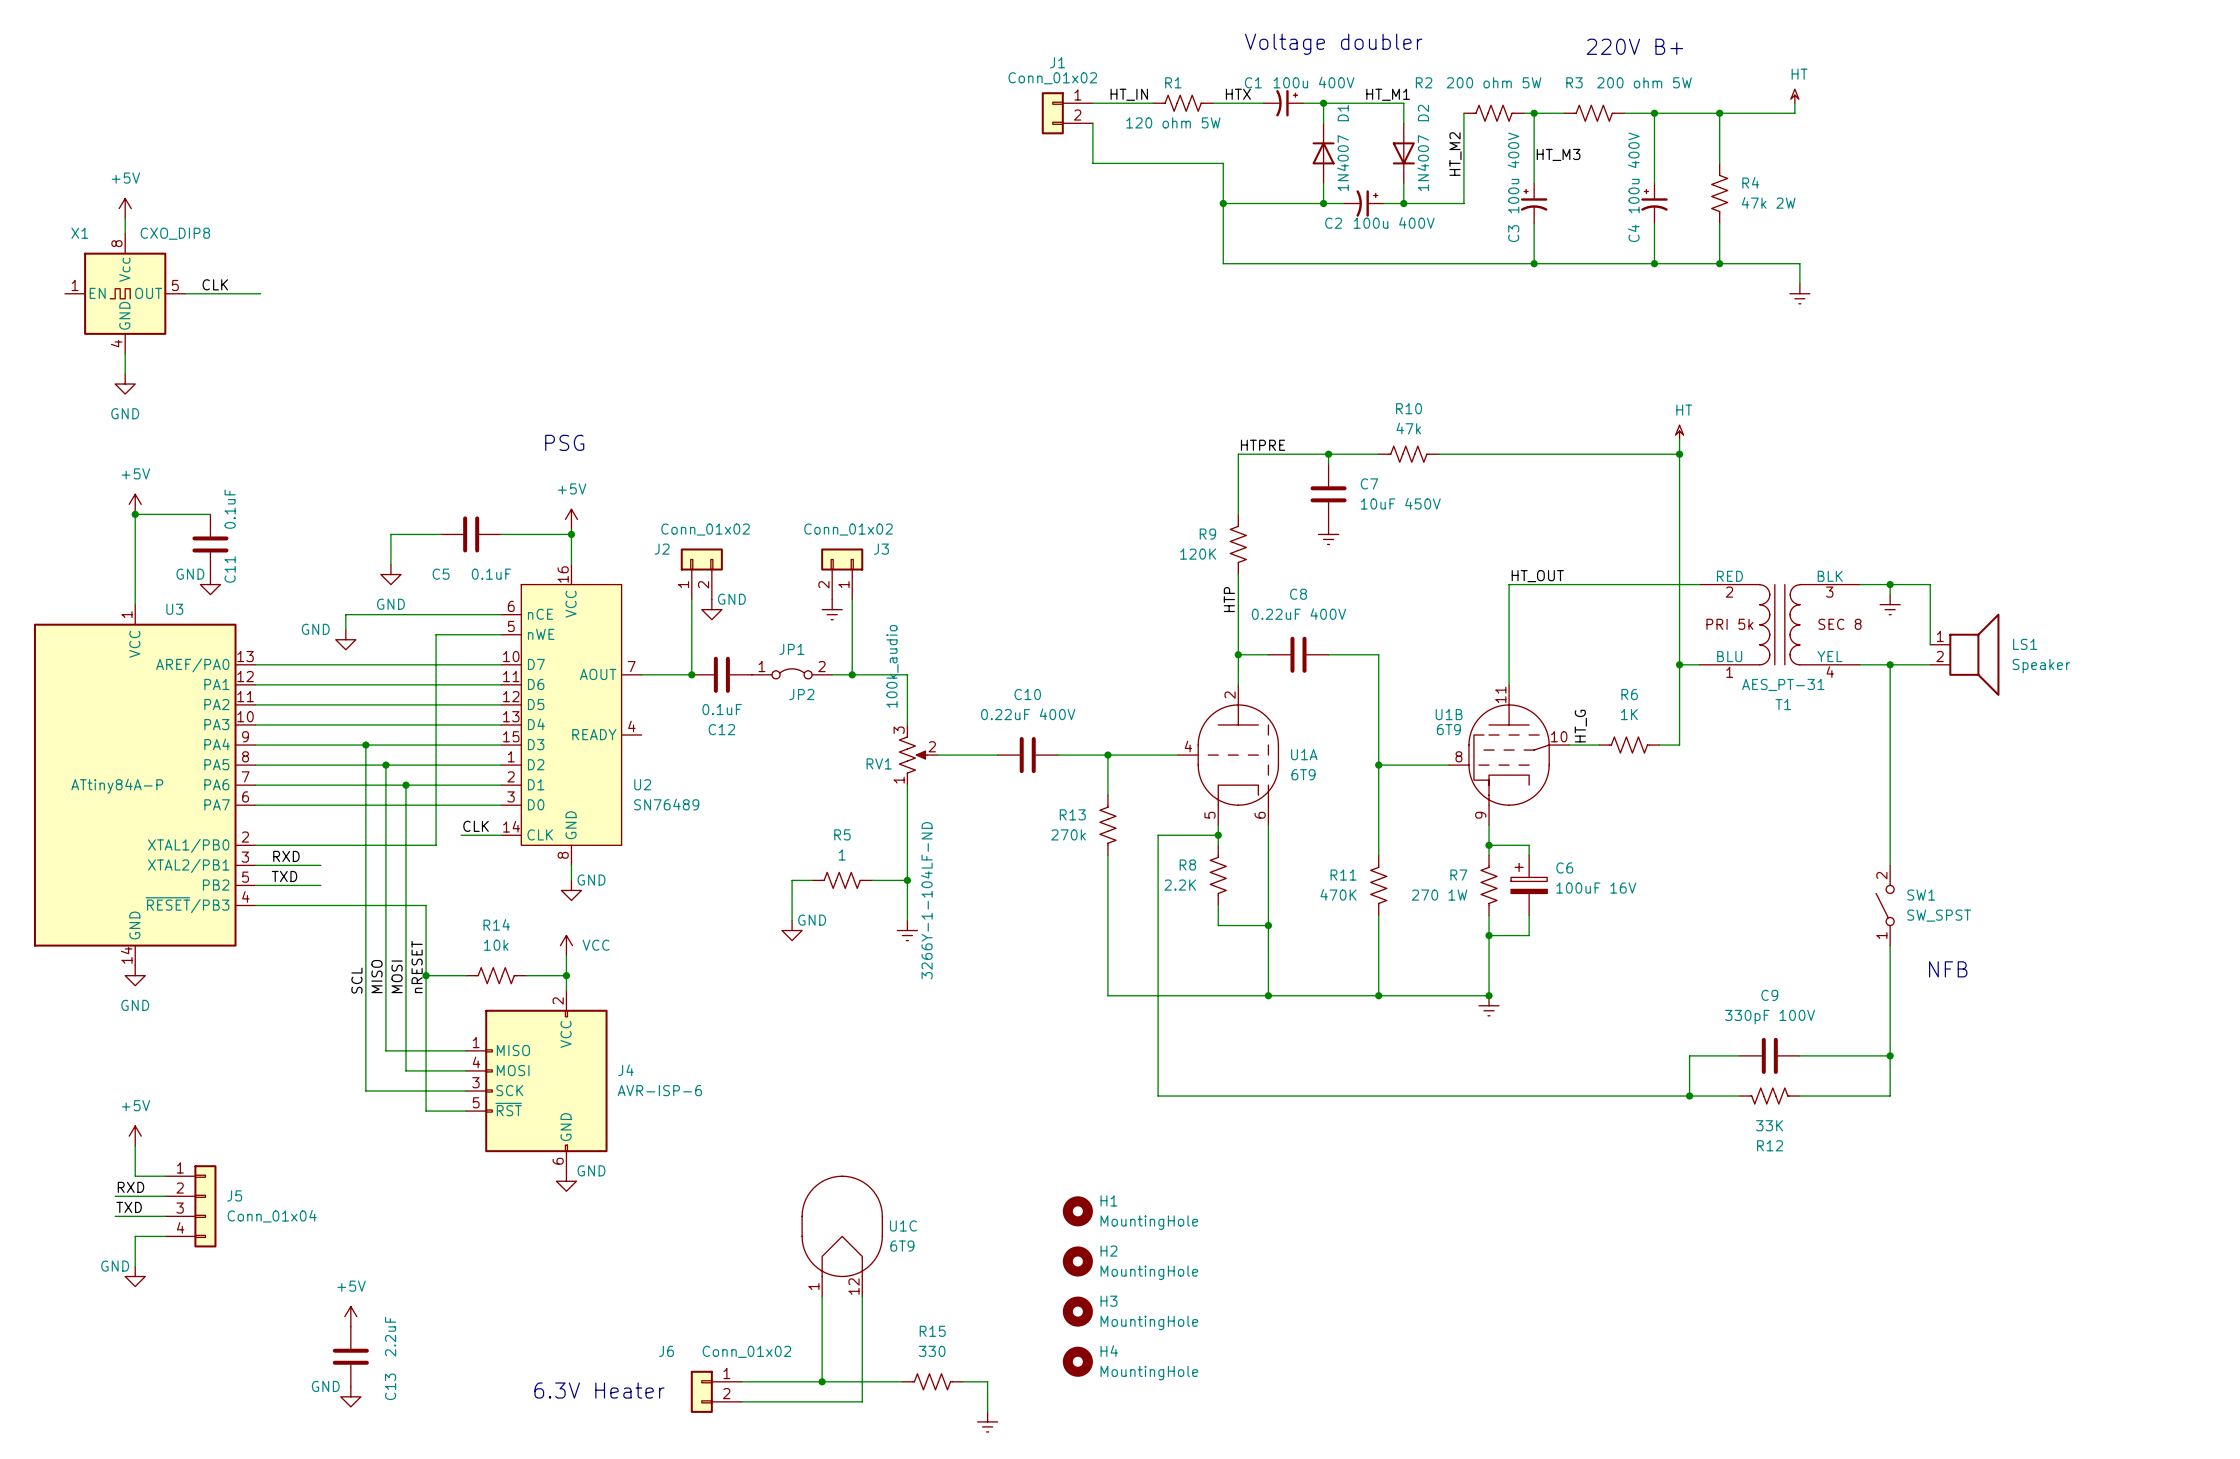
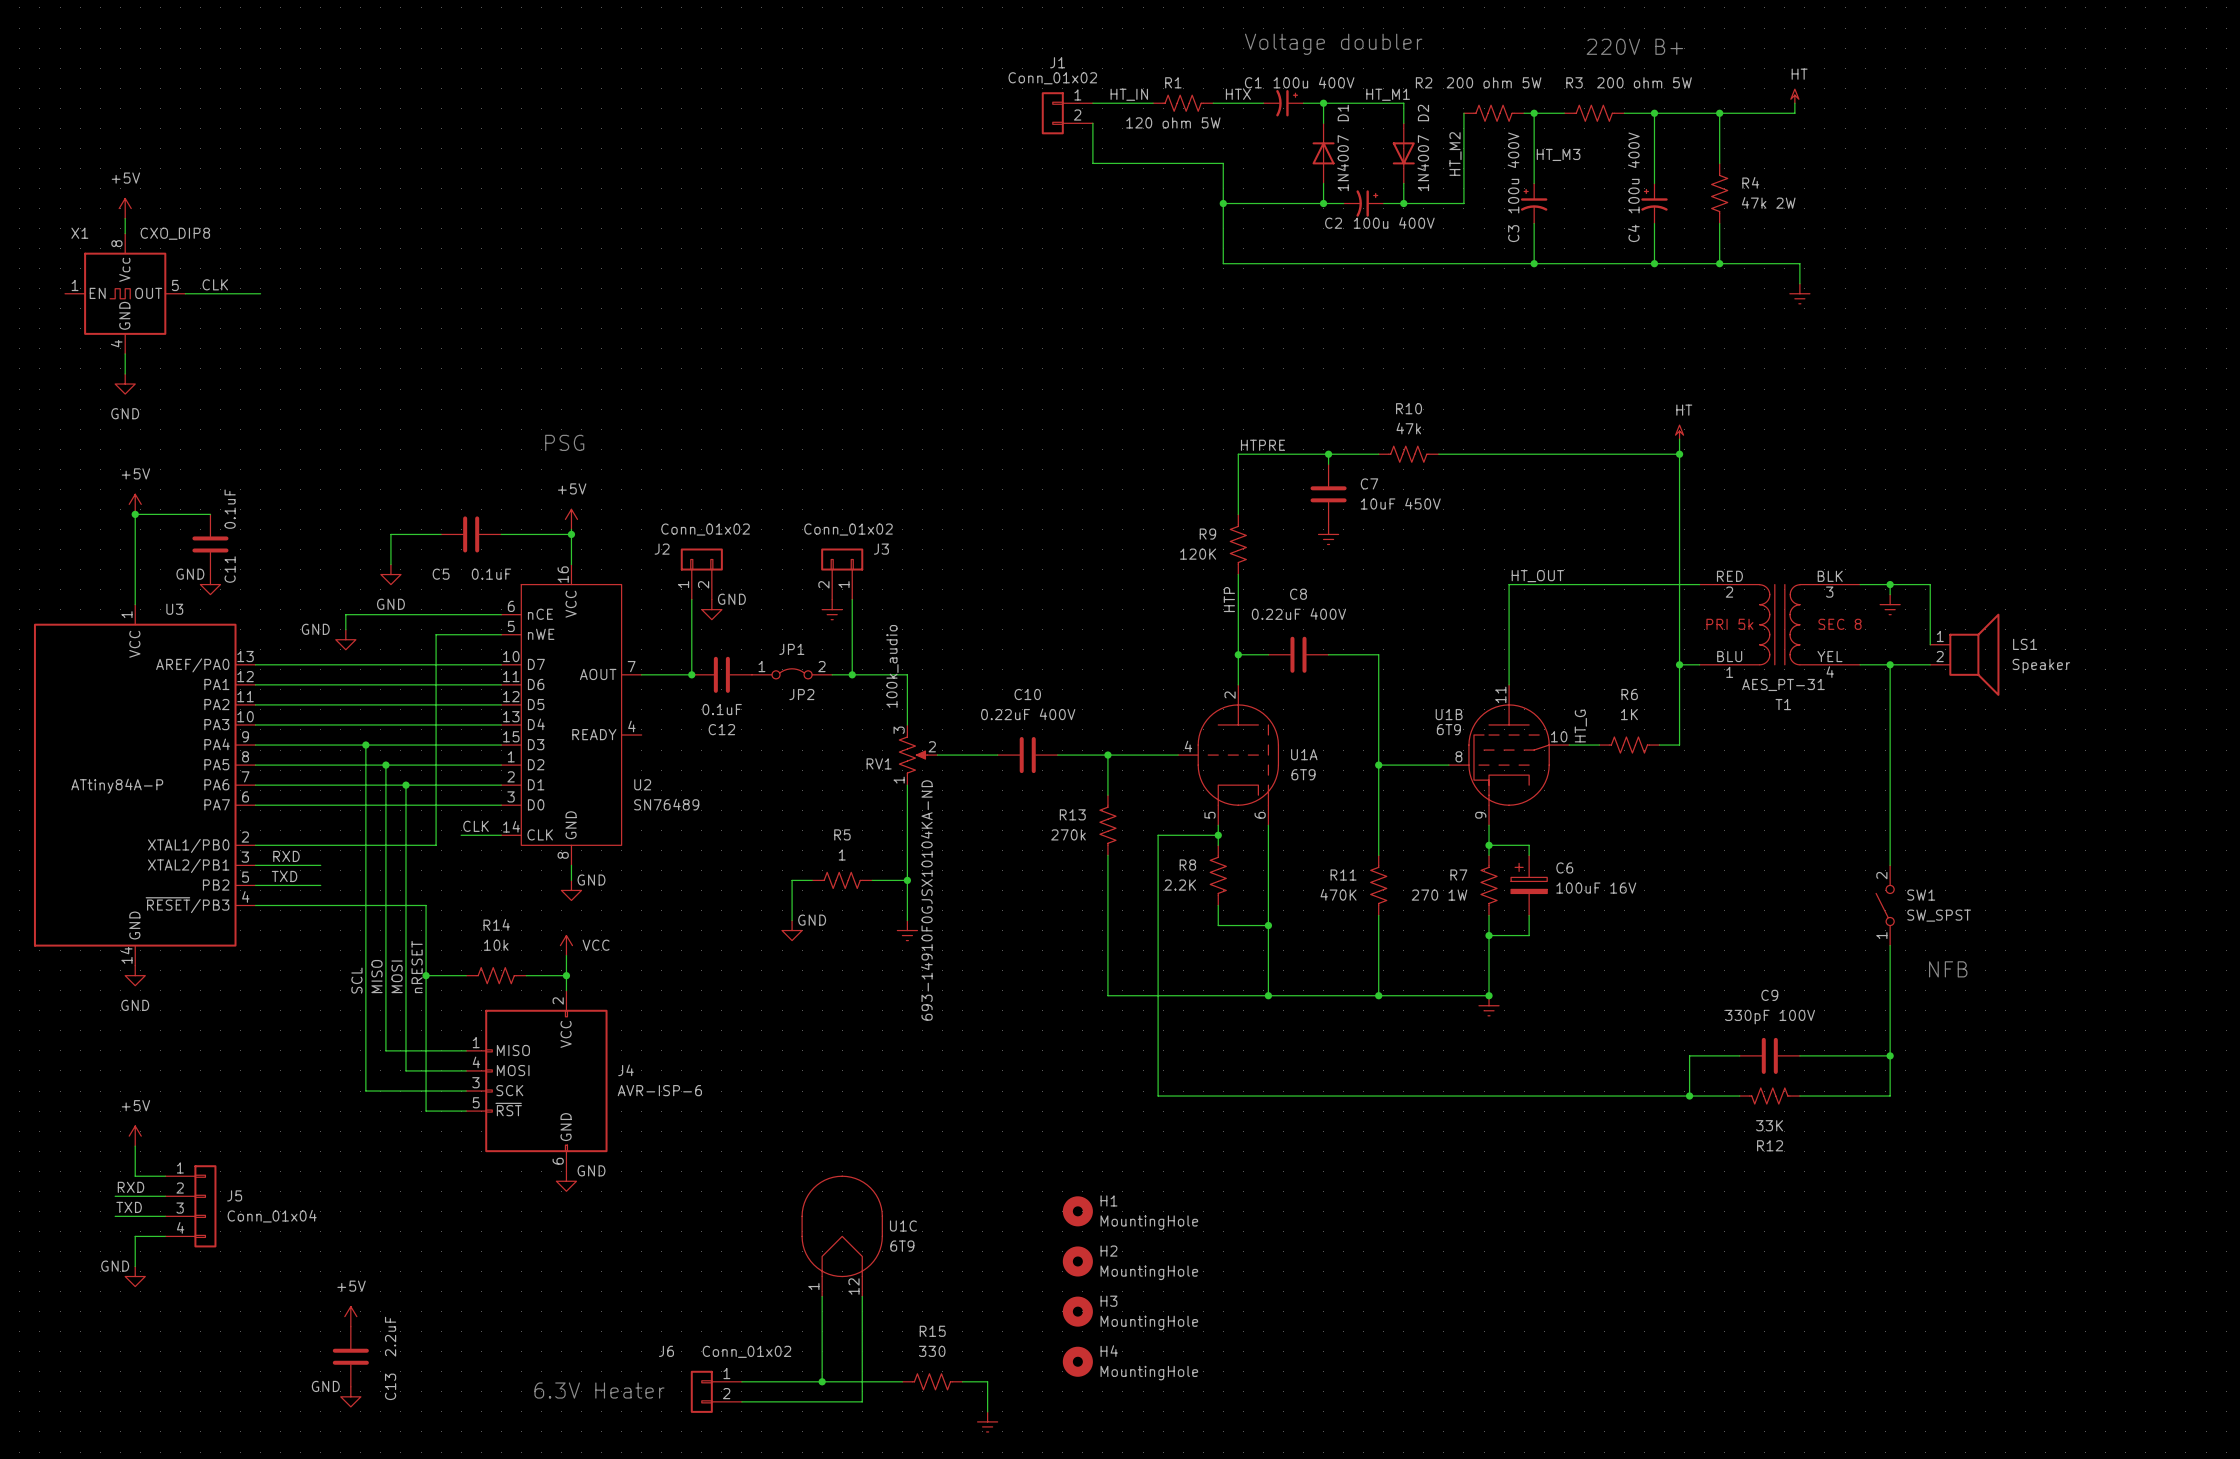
RV1 text: 3266Y-1-104LF-ND (926, 900) -> 693-14910F0GJSX10104KA-ND (926, 900)

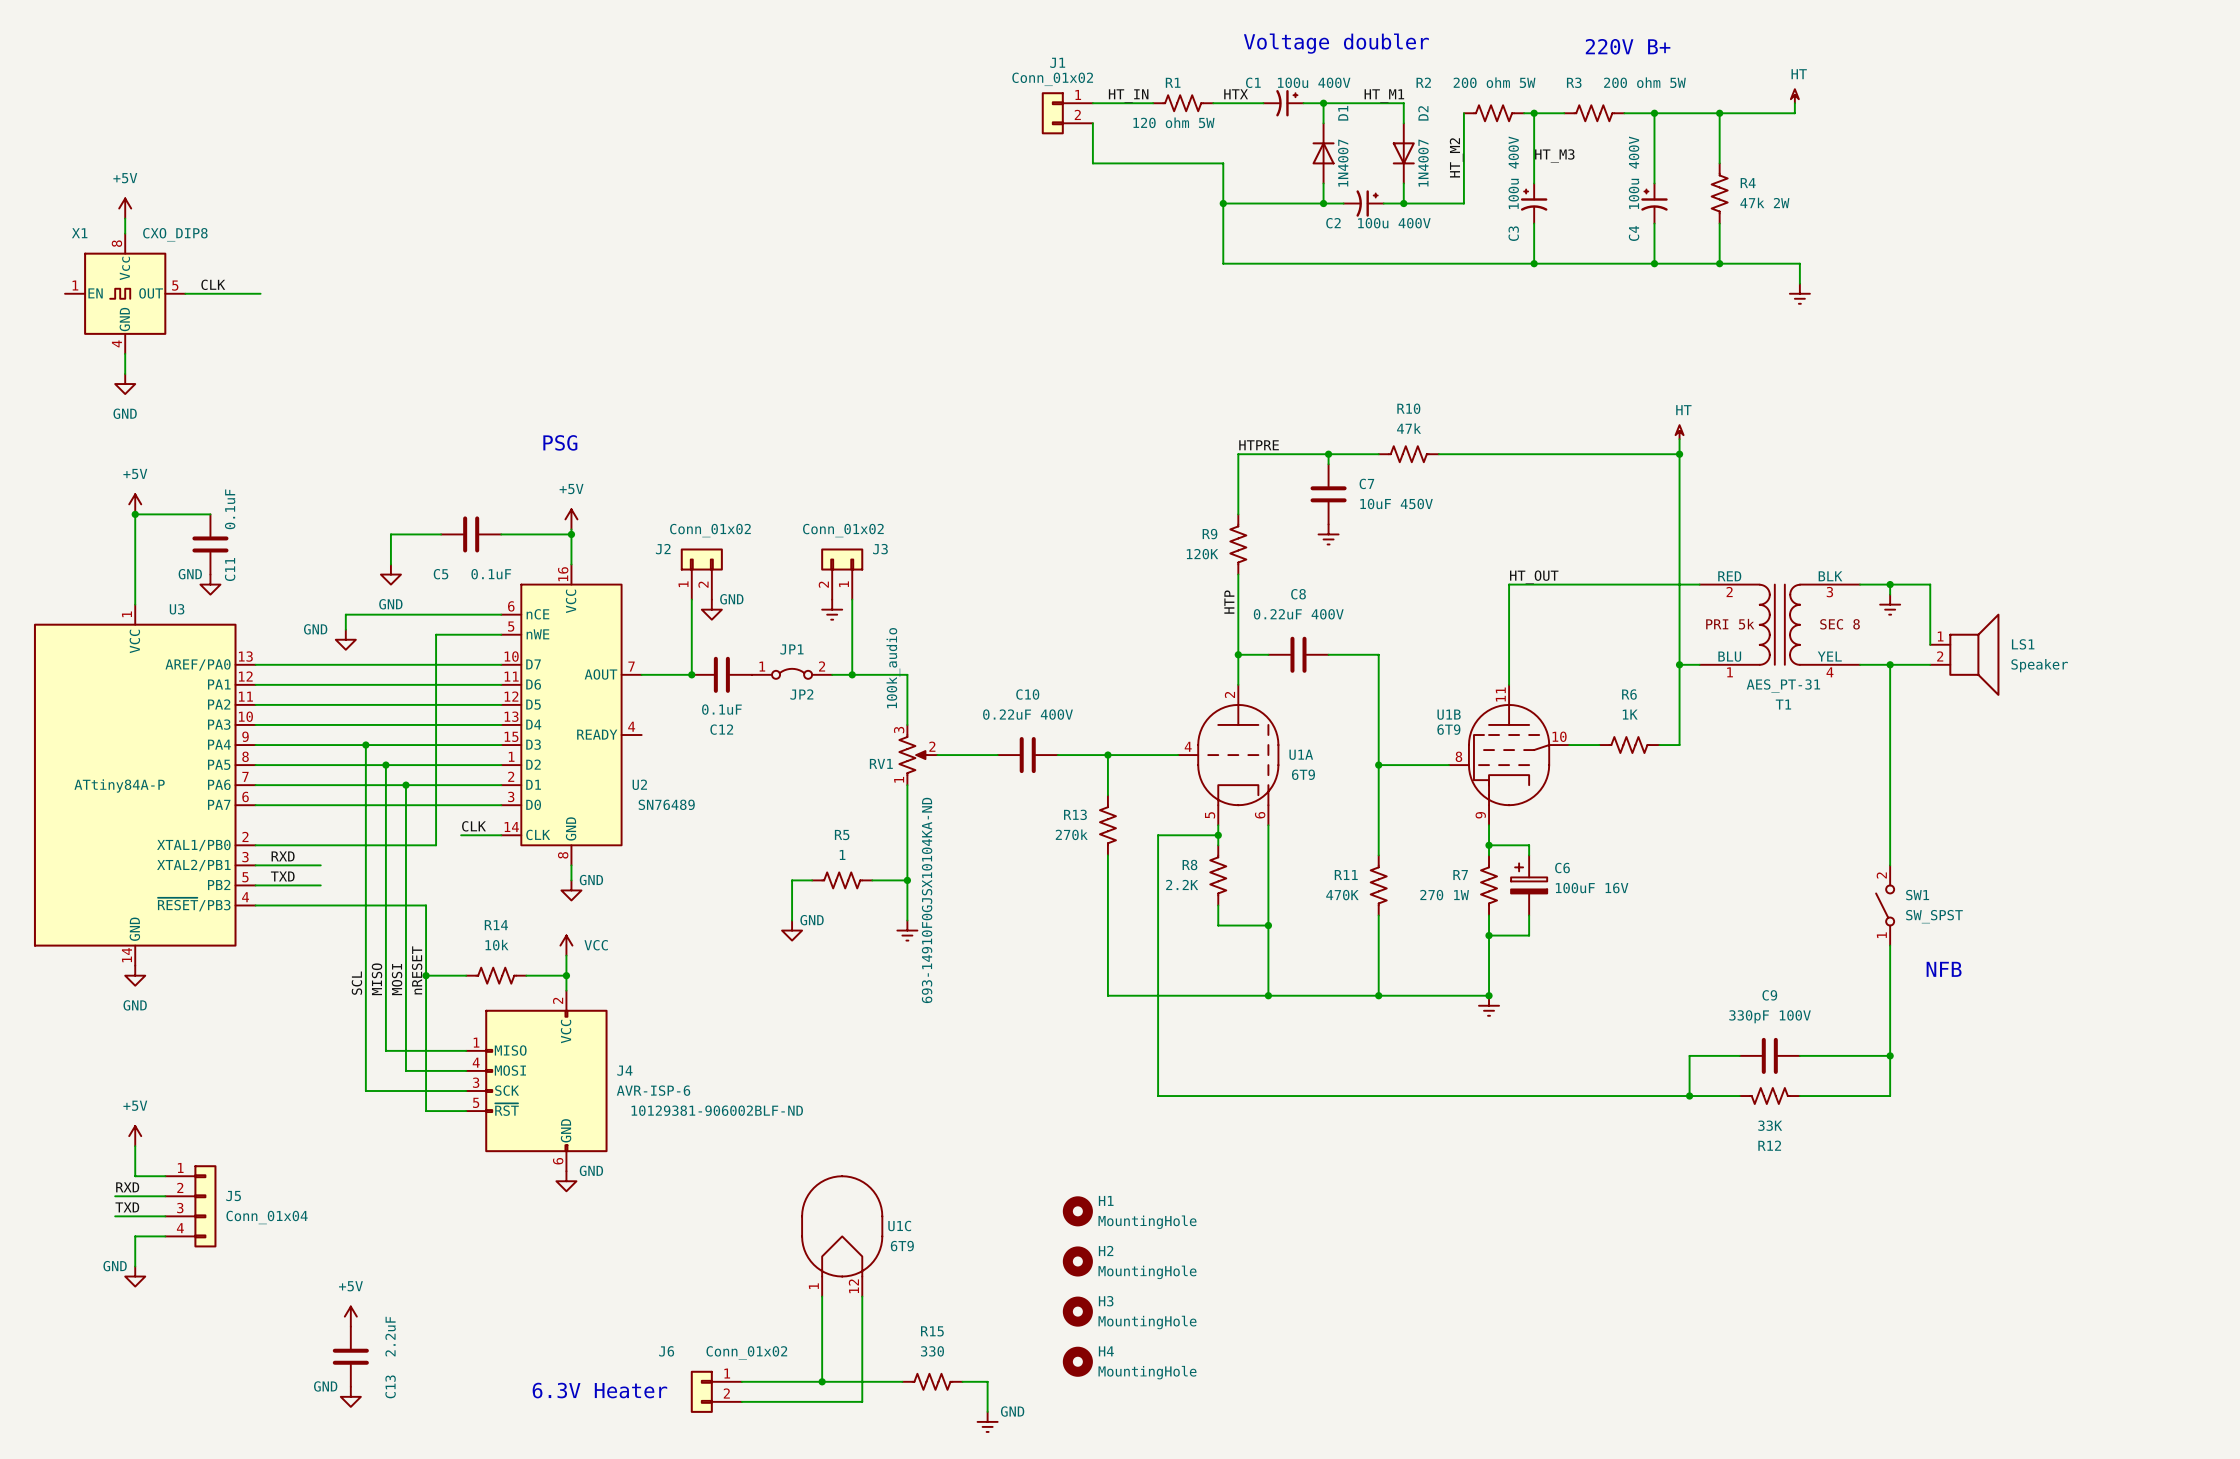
label: HT_G (1580, 726) -> none
J4 text: none -> 10129381-906002BLF-ND (717, 1110)
power symbol text: none -> GND (1012, 1411)

